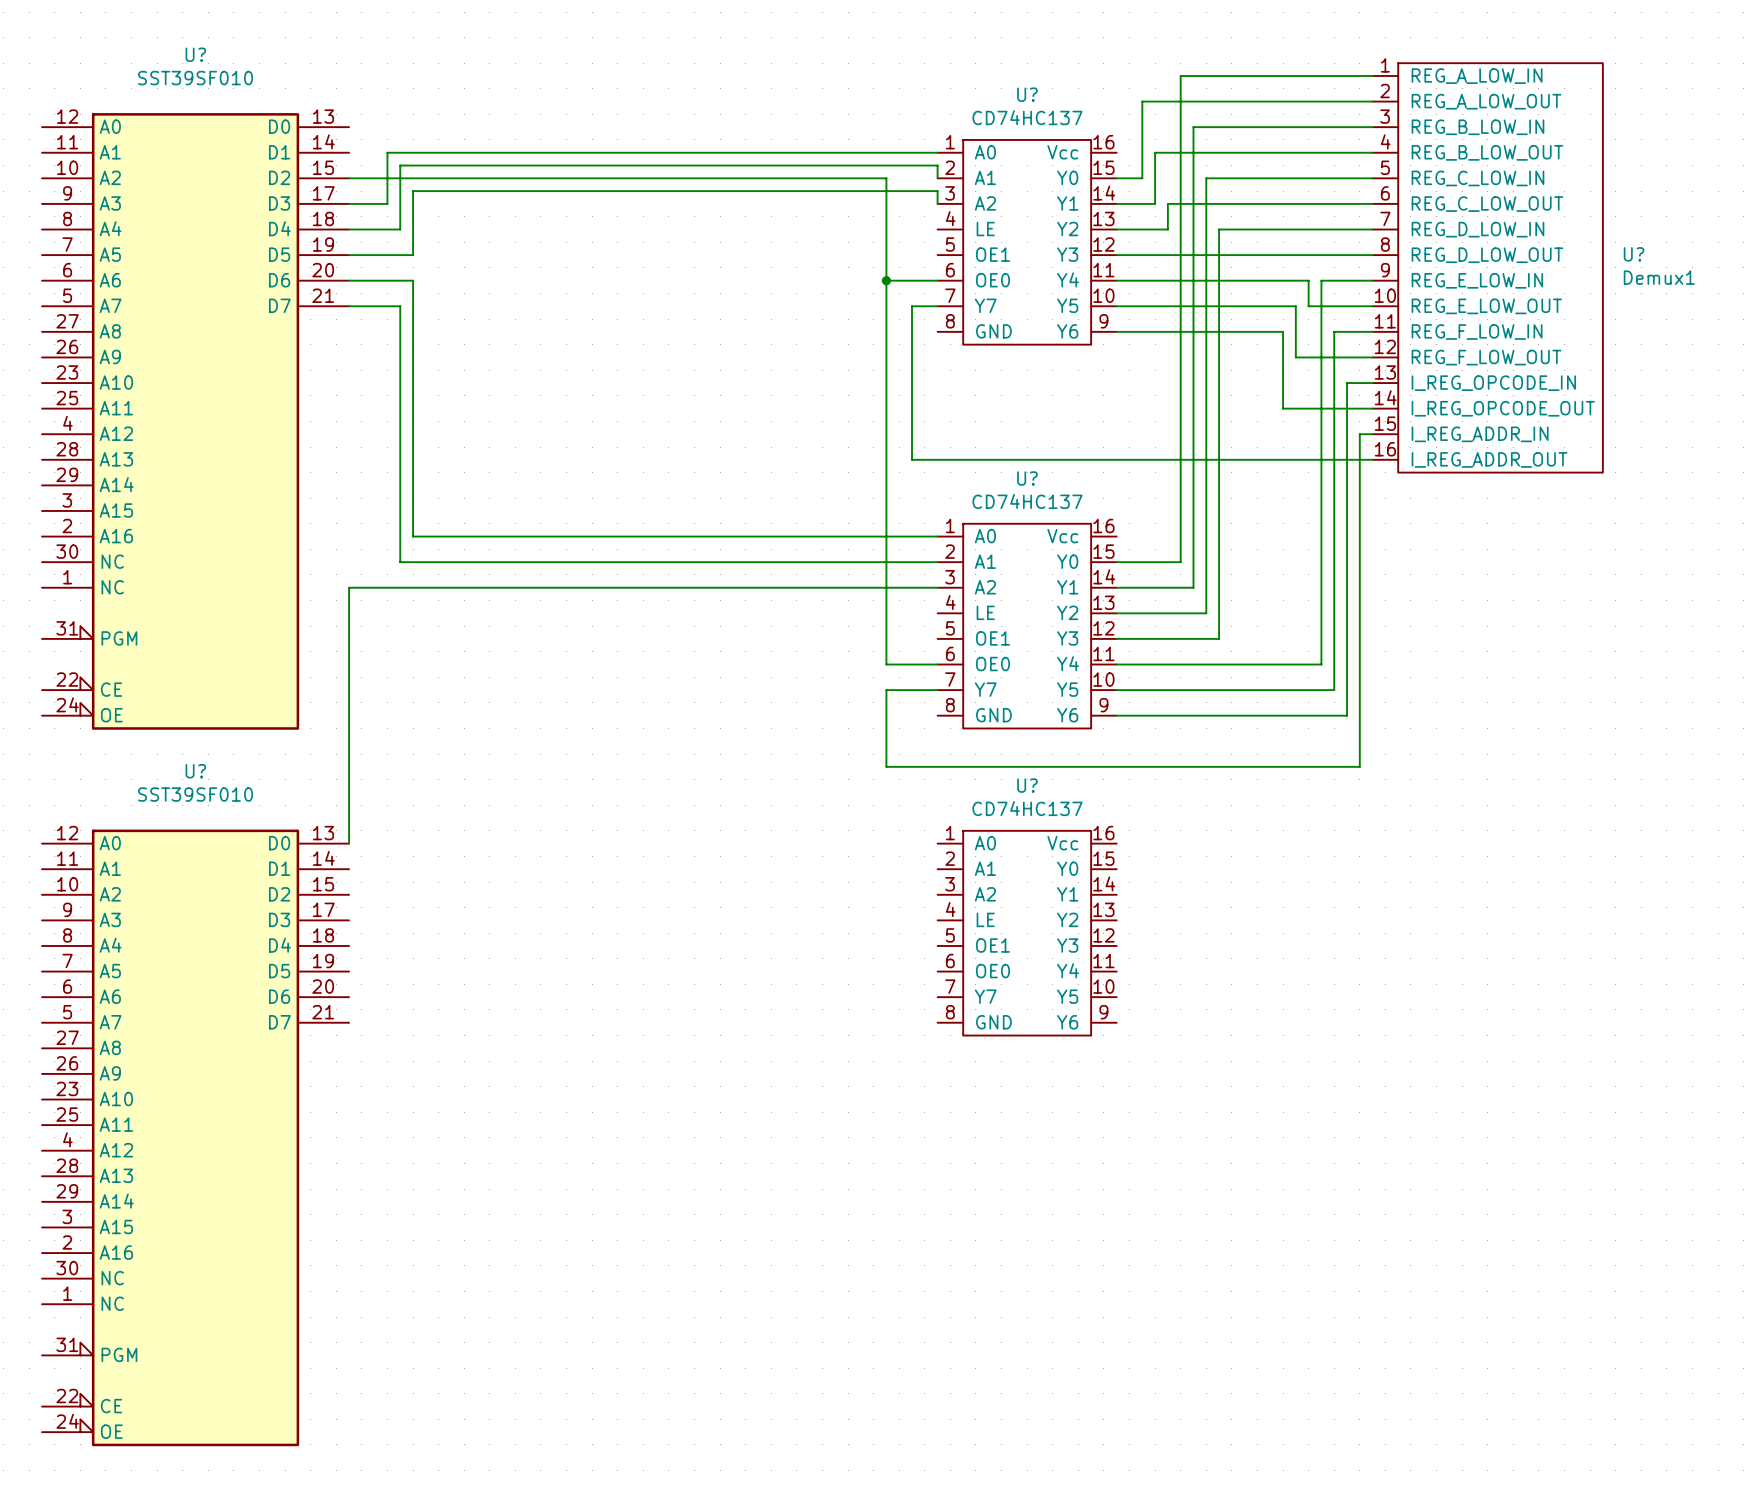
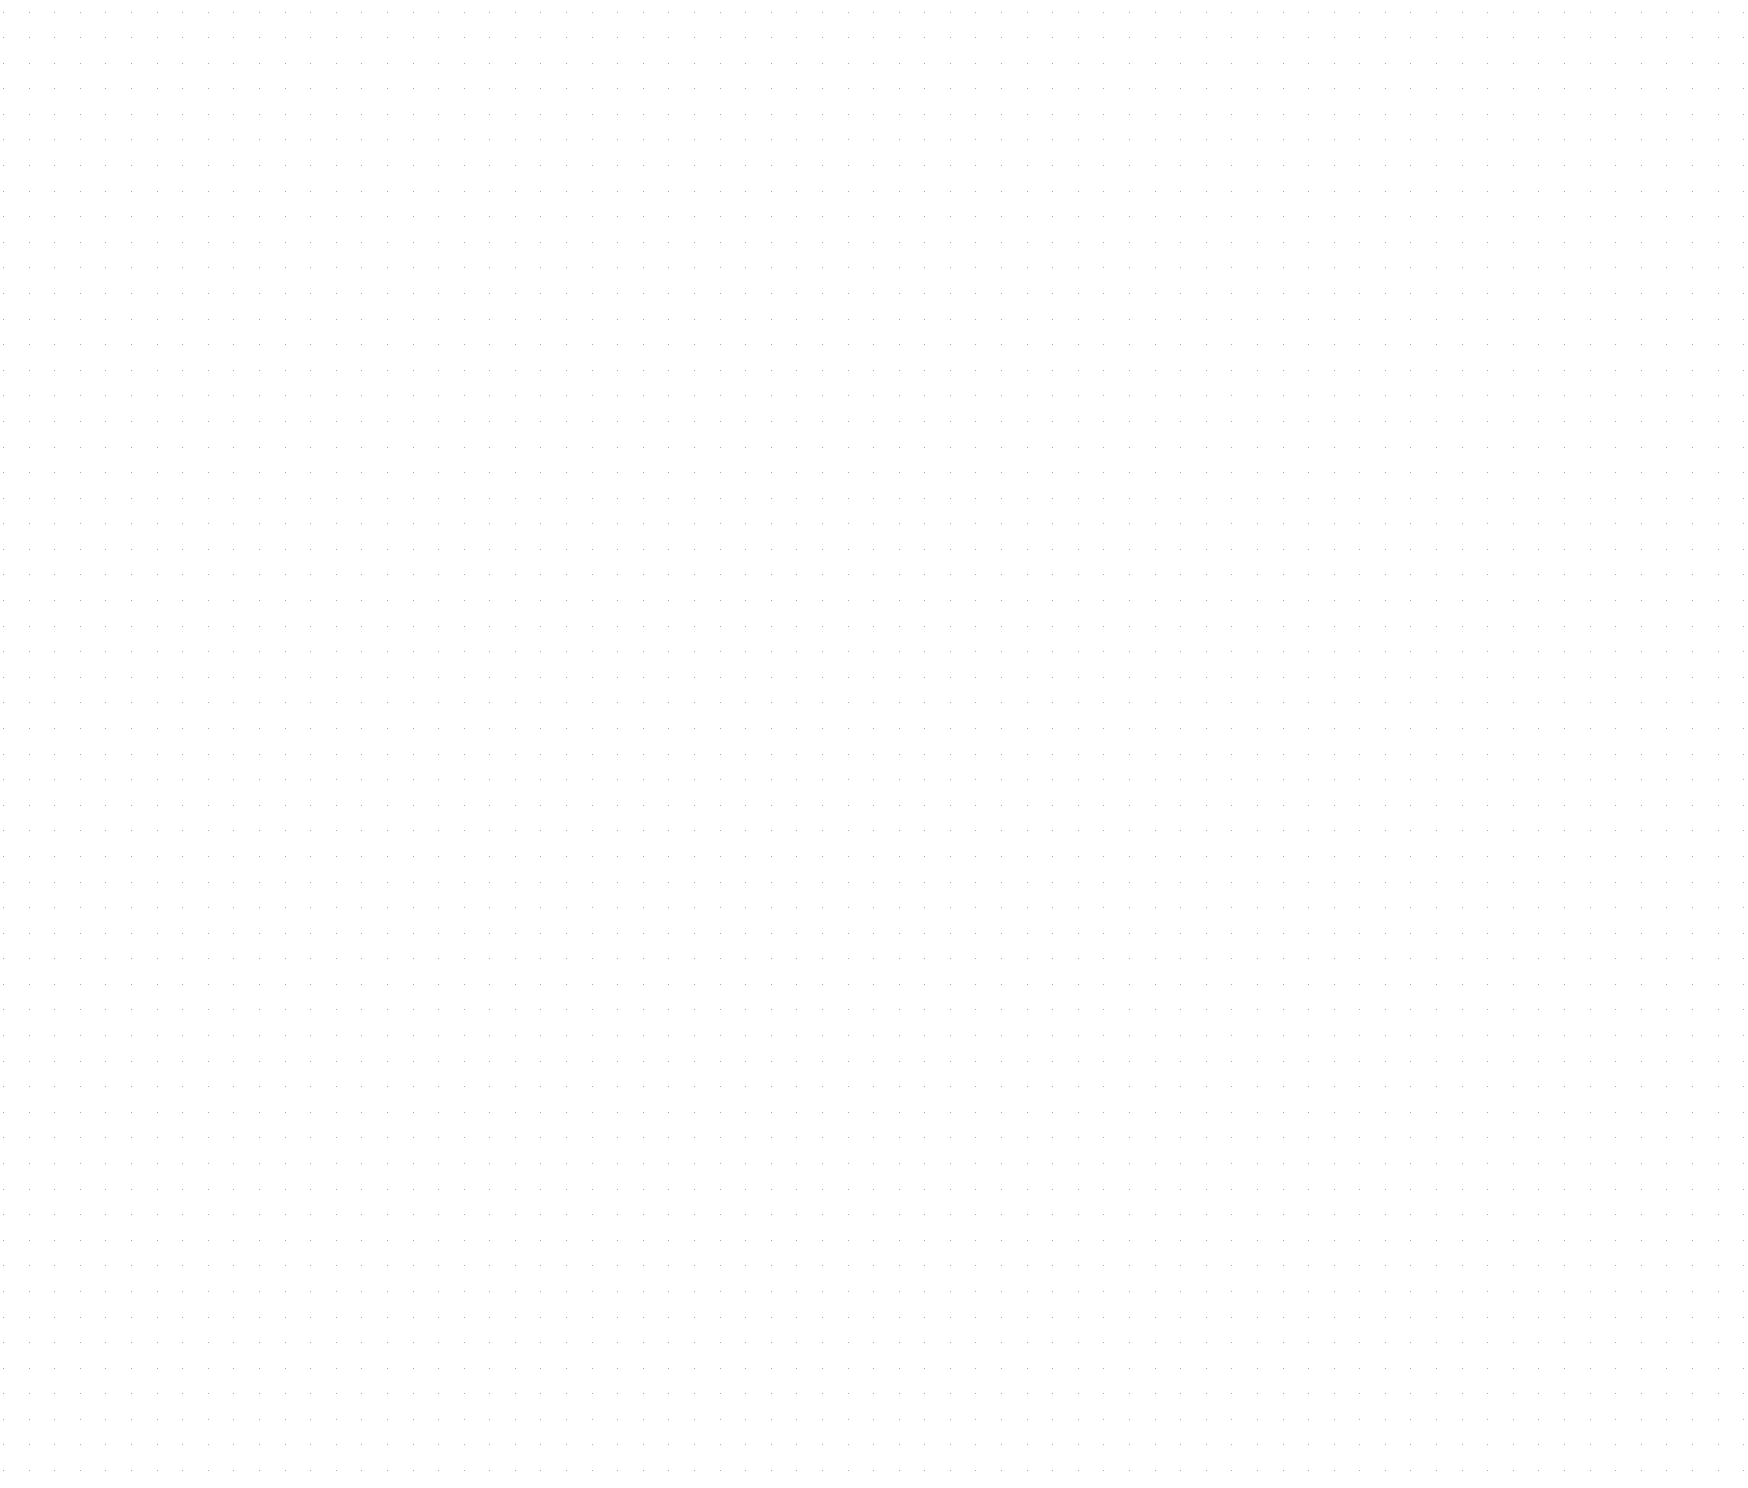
wire: (1372, 75) (1180, 75) (1180, 562) (1116, 562) -> none
wire: (1372, 101) (1142, 101) (1142, 178) (1116, 178) -> none
wire: (1372, 127) (1193, 127) (1193, 587) (1116, 587) -> none
wire: (937, 152) (387, 152) (387, 203) (349, 203) -> none
wire: (1372, 152) (1155, 152) (1155, 203) (1116, 203) -> none
wire: (349, 178) (886, 178) (886, 664) (937, 664) -> none
wire: (937, 178) (937, 165) (400, 165) (400, 229) (349, 229) -> none
wire: (1372, 178) (1206, 178) (1206, 613) (1116, 613) -> none
wire: (937, 203) (937, 191) (413, 191) (413, 255) (349, 255) -> none
wire: (1372, 203) (1167, 203) (1167, 229) (1116, 229) -> none
wire: (1372, 229) (1219, 229) (1219, 638) (1116, 638) -> none
U?: CD74HC137 (1027, 242) -> none
wire: (1116, 255) (1372, 255) -> none
U?: Demux1 (1487, 267) -> none
wire: (349, 280) (413, 280) (413, 536) (937, 536) -> none
wire: (886, 280) (937, 280) -> none
junction: (886, 280) -> none
wire: (1116, 280) (1308, 280) (1308, 306) (1372, 306) -> none
wire: (1372, 280) (1321, 280) (1321, 664) (1116, 664) -> none
wire: (349, 306) (400, 306) (400, 562) (937, 562) -> none
wire: (937, 306) (912, 306) (912, 459) (1372, 459) -> none
wire: (1116, 306) (1295, 306) (1295, 357) (1372, 357) -> none
wire: (1116, 331) (1283, 331) (1283, 408) (1372, 408) -> none
wire: (1372, 331) (1334, 331) (1334, 690) (1116, 690) -> none
wire: (1372, 383) (1347, 383) (1347, 715) (1116, 715) -> none
U?: SST39SF010 (195, 421) -> none
wire: (1372, 434) (1359, 434) (1359, 766) (886, 766) (886, 690) (937, 690) -> none
wire: (937, 587) (349, 587) (349, 843) -> none
U?: CD74HC137 (1027, 626) -> none
U?: CD74HC137 (1027, 933) -> none
U?: SST39SF010 (195, 1137) -> none

